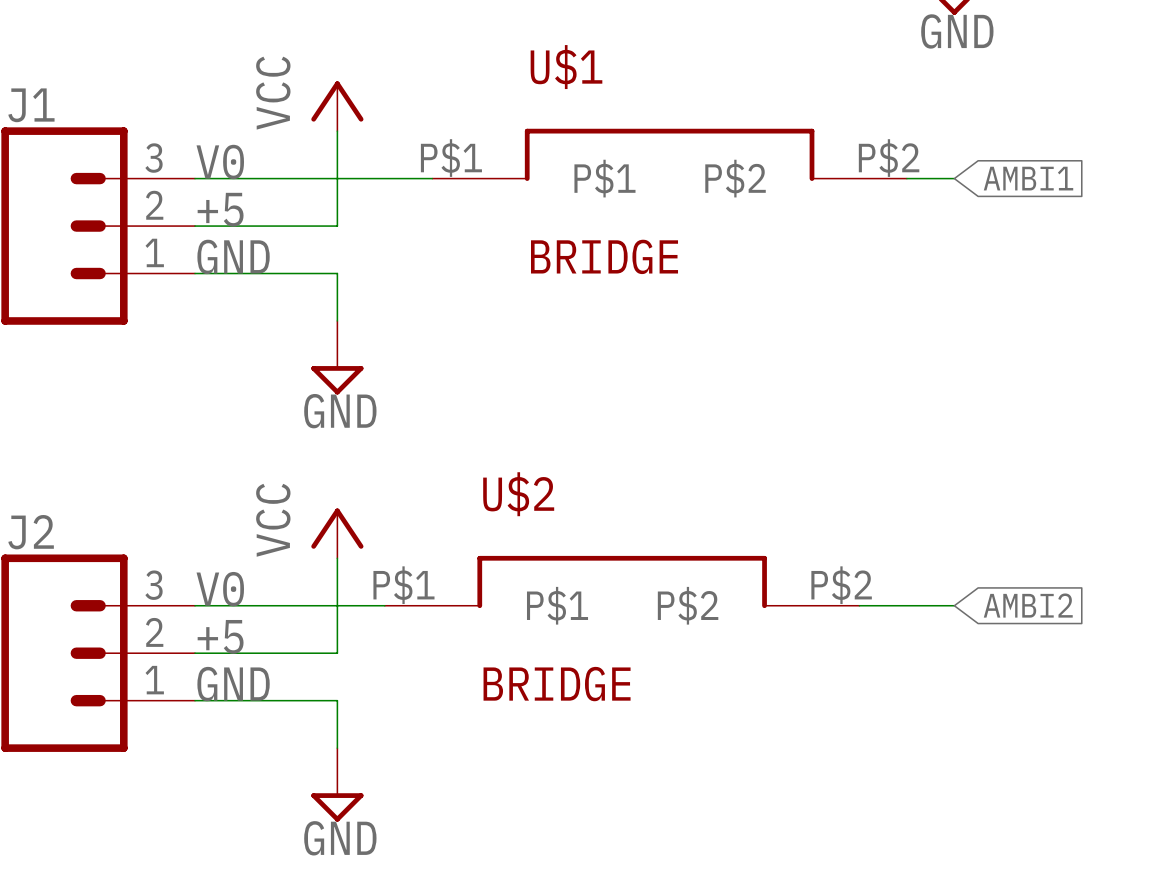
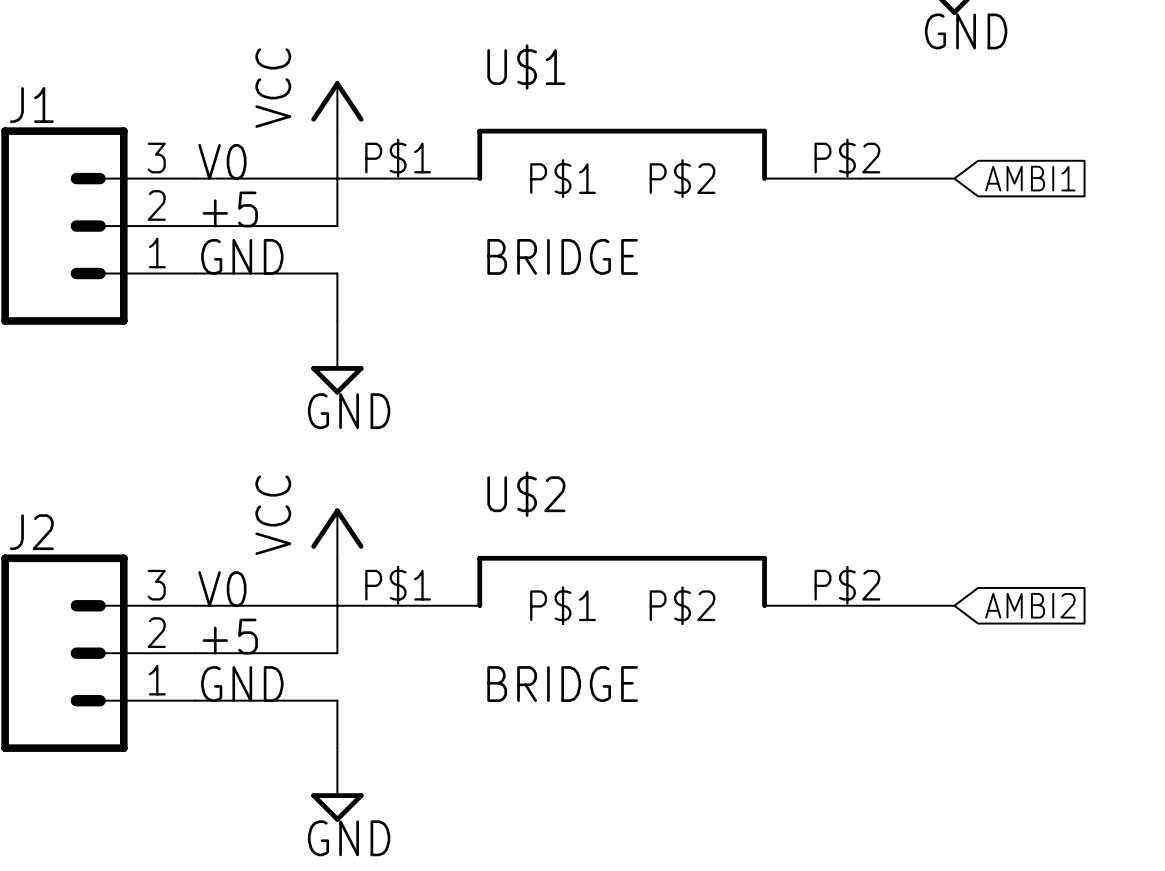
U$1 position: (669, 154) -> (622, 154)

